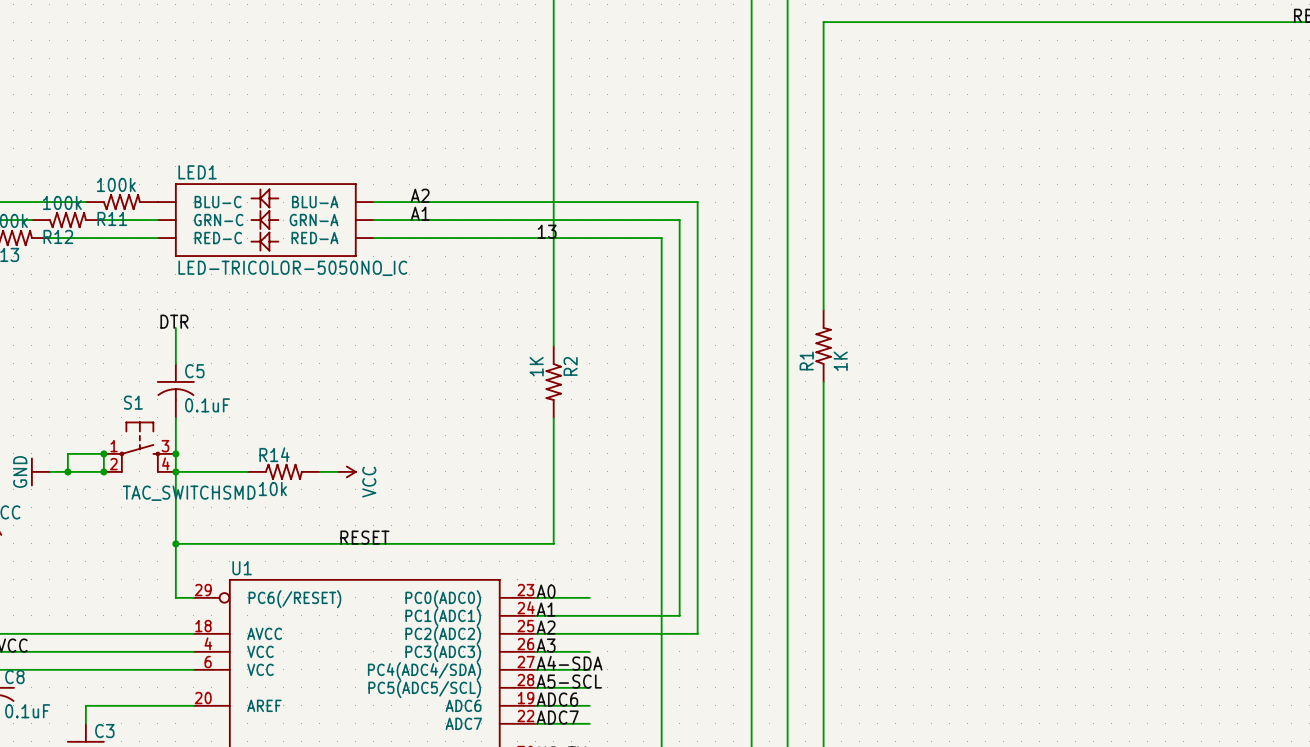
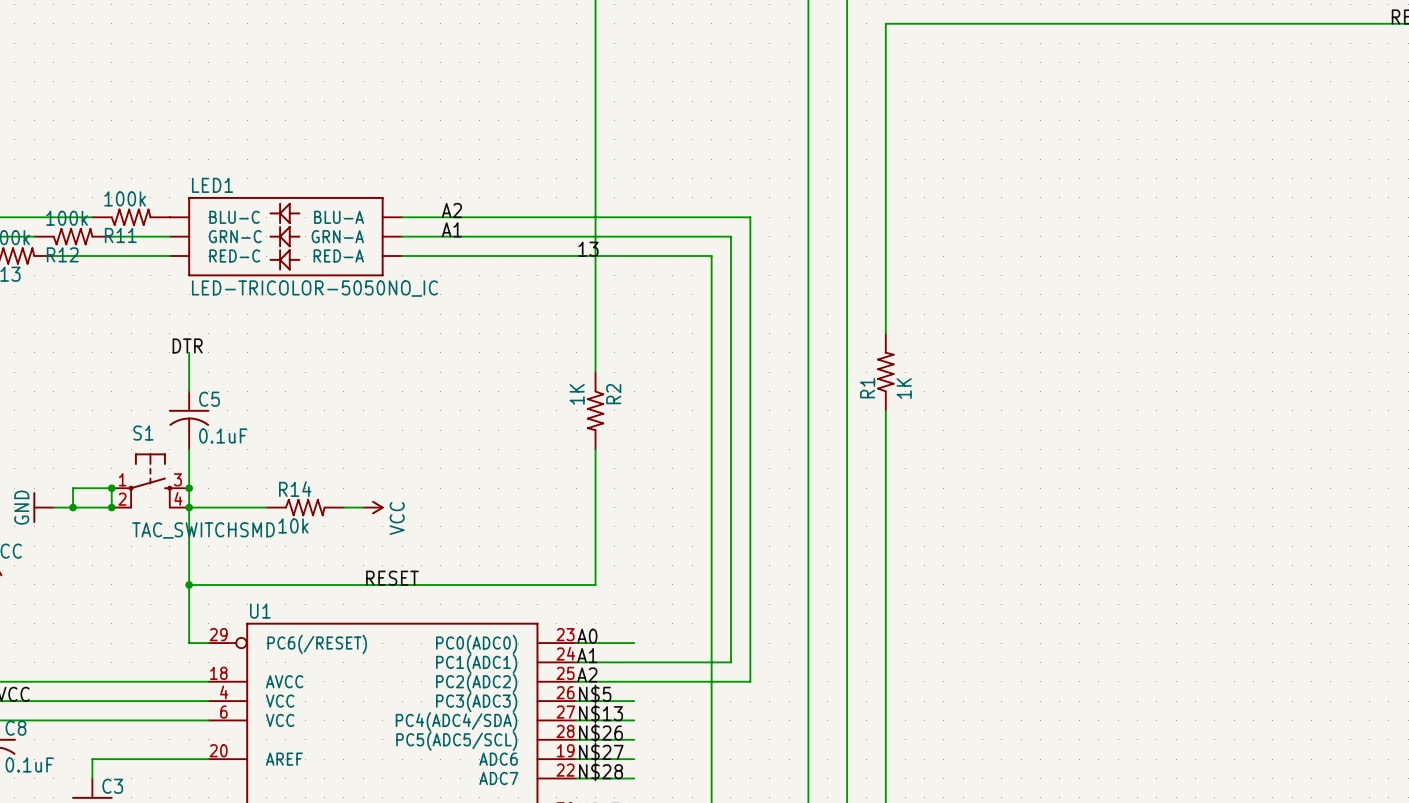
label: A3 (546, 645) -> N$5 (595, 694)
label: A4-SDA (569, 663) -> N$13 (600, 713)
label: A5-SCL (569, 681) -> N$26 (600, 733)
label: ADC6 (557, 699) -> N$27 (601, 752)
label: ADC7 (557, 717) -> N$28 (600, 771)

